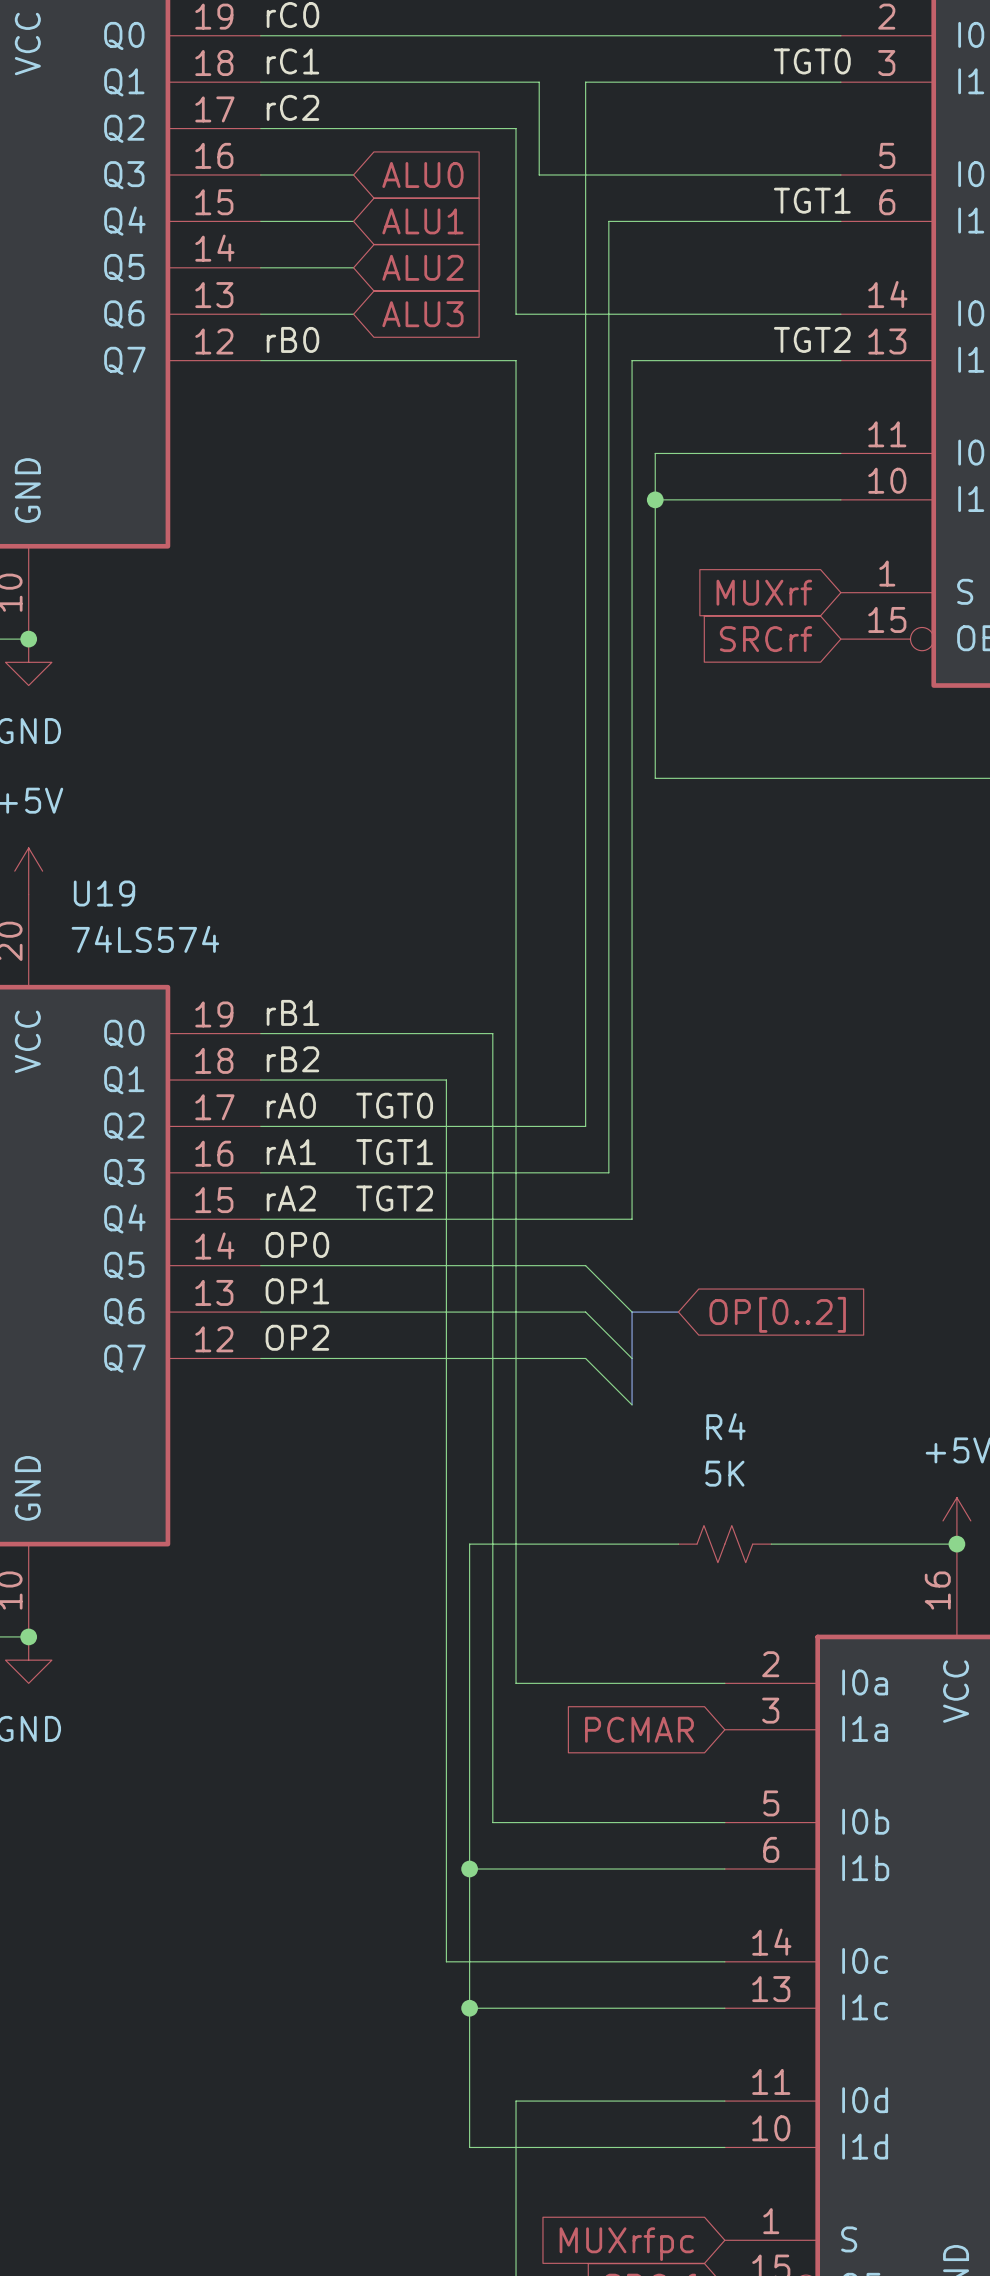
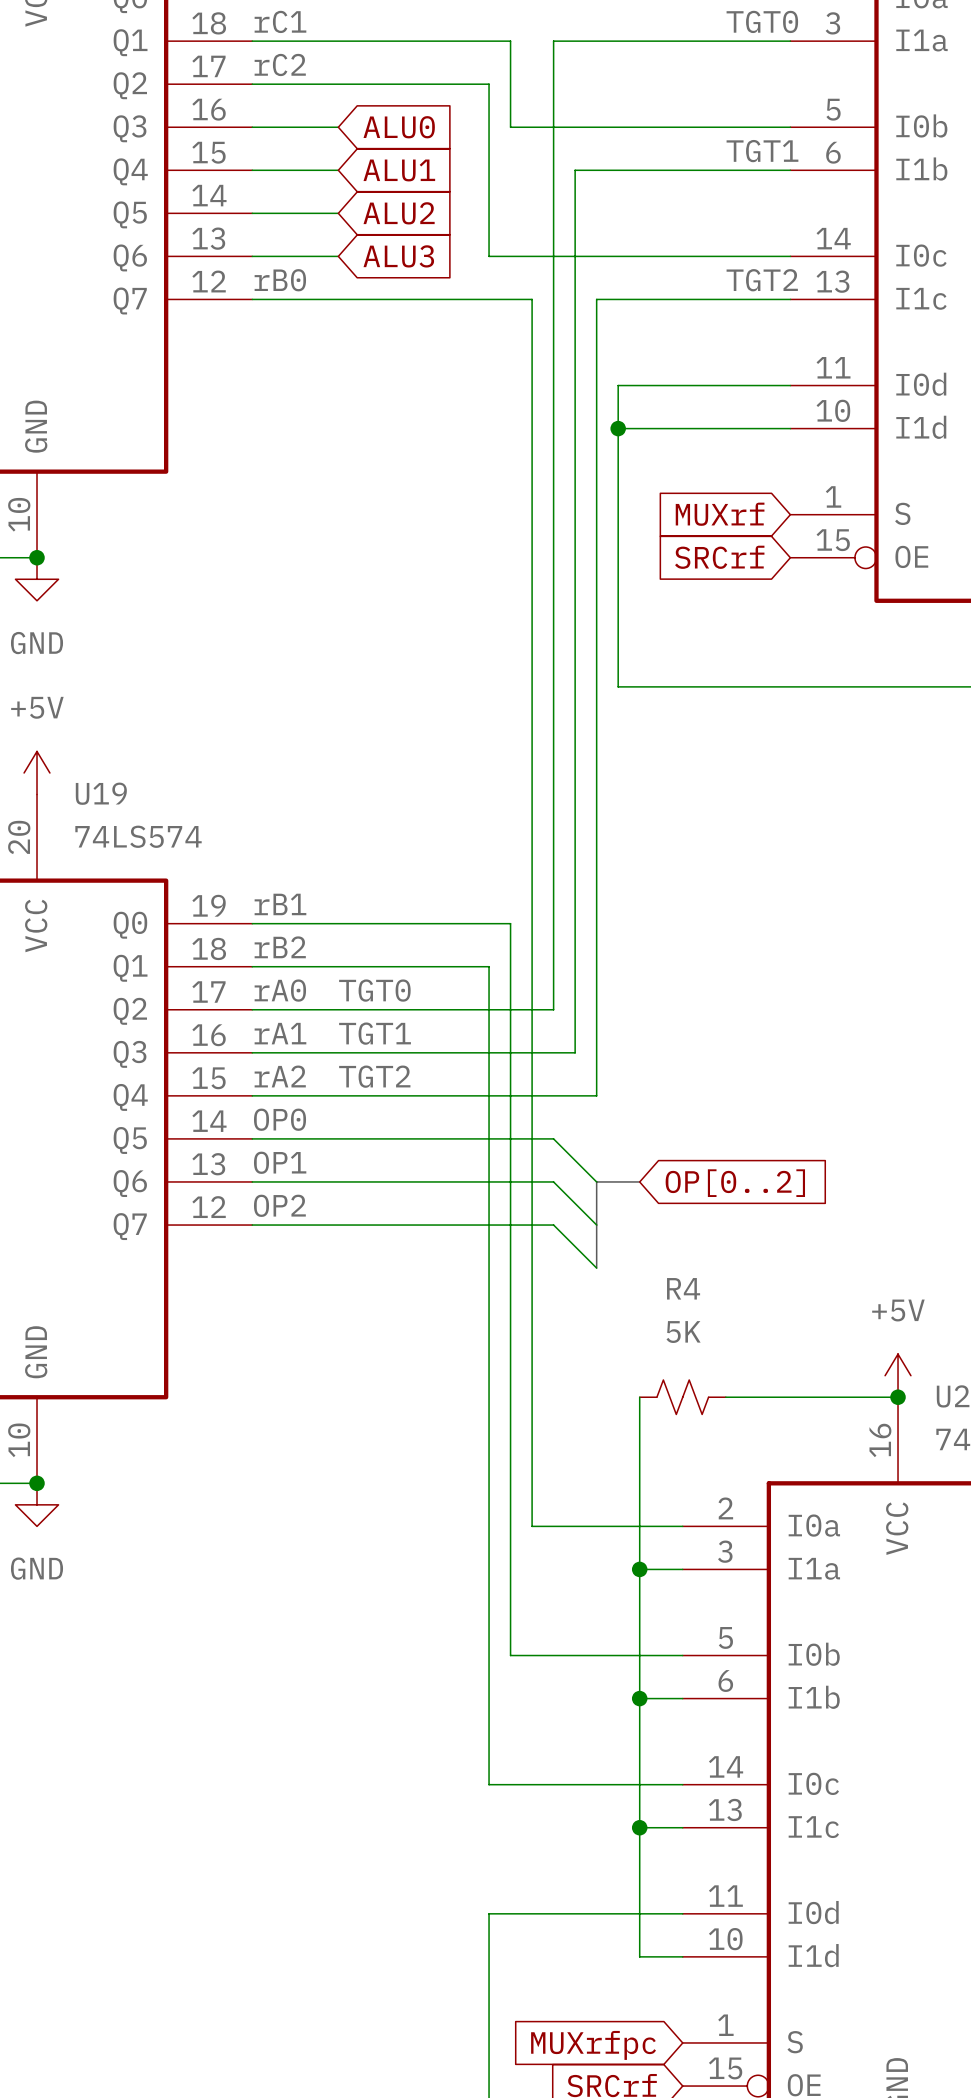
wire: (516, 360) (516, 1080) -> (489, 299) (532, 299) (532, 1526)
wire: (492, 1033) (492, 1822) (539, 1822) -> (467, 923) (510, 923) (510, 1655)
wire: (446, 1080) (446, 1961) (516, 1961) -> (424, 966) (489, 966)
wire: (678, 1544) (469, 1544) (469, 2147) (678, 2147) -> (639, 1397) (639, 1956)
wire: (516, 1683) (562, 1683) -> (489, 1526) (489, 1784)
global label: PCMAR (639, 1729) -> none
wire: none -> (639, 1569) (682, 1569)
junction: none -> (639, 1569)
wire: (469, 1869) (678, 1869) -> none
junction: (469, 1869) -> none
junction: none -> (639, 1698)
wire: (469, 2008) (678, 2008) -> none
junction: (469, 2008) -> none
junction: none -> (639, 1827)

